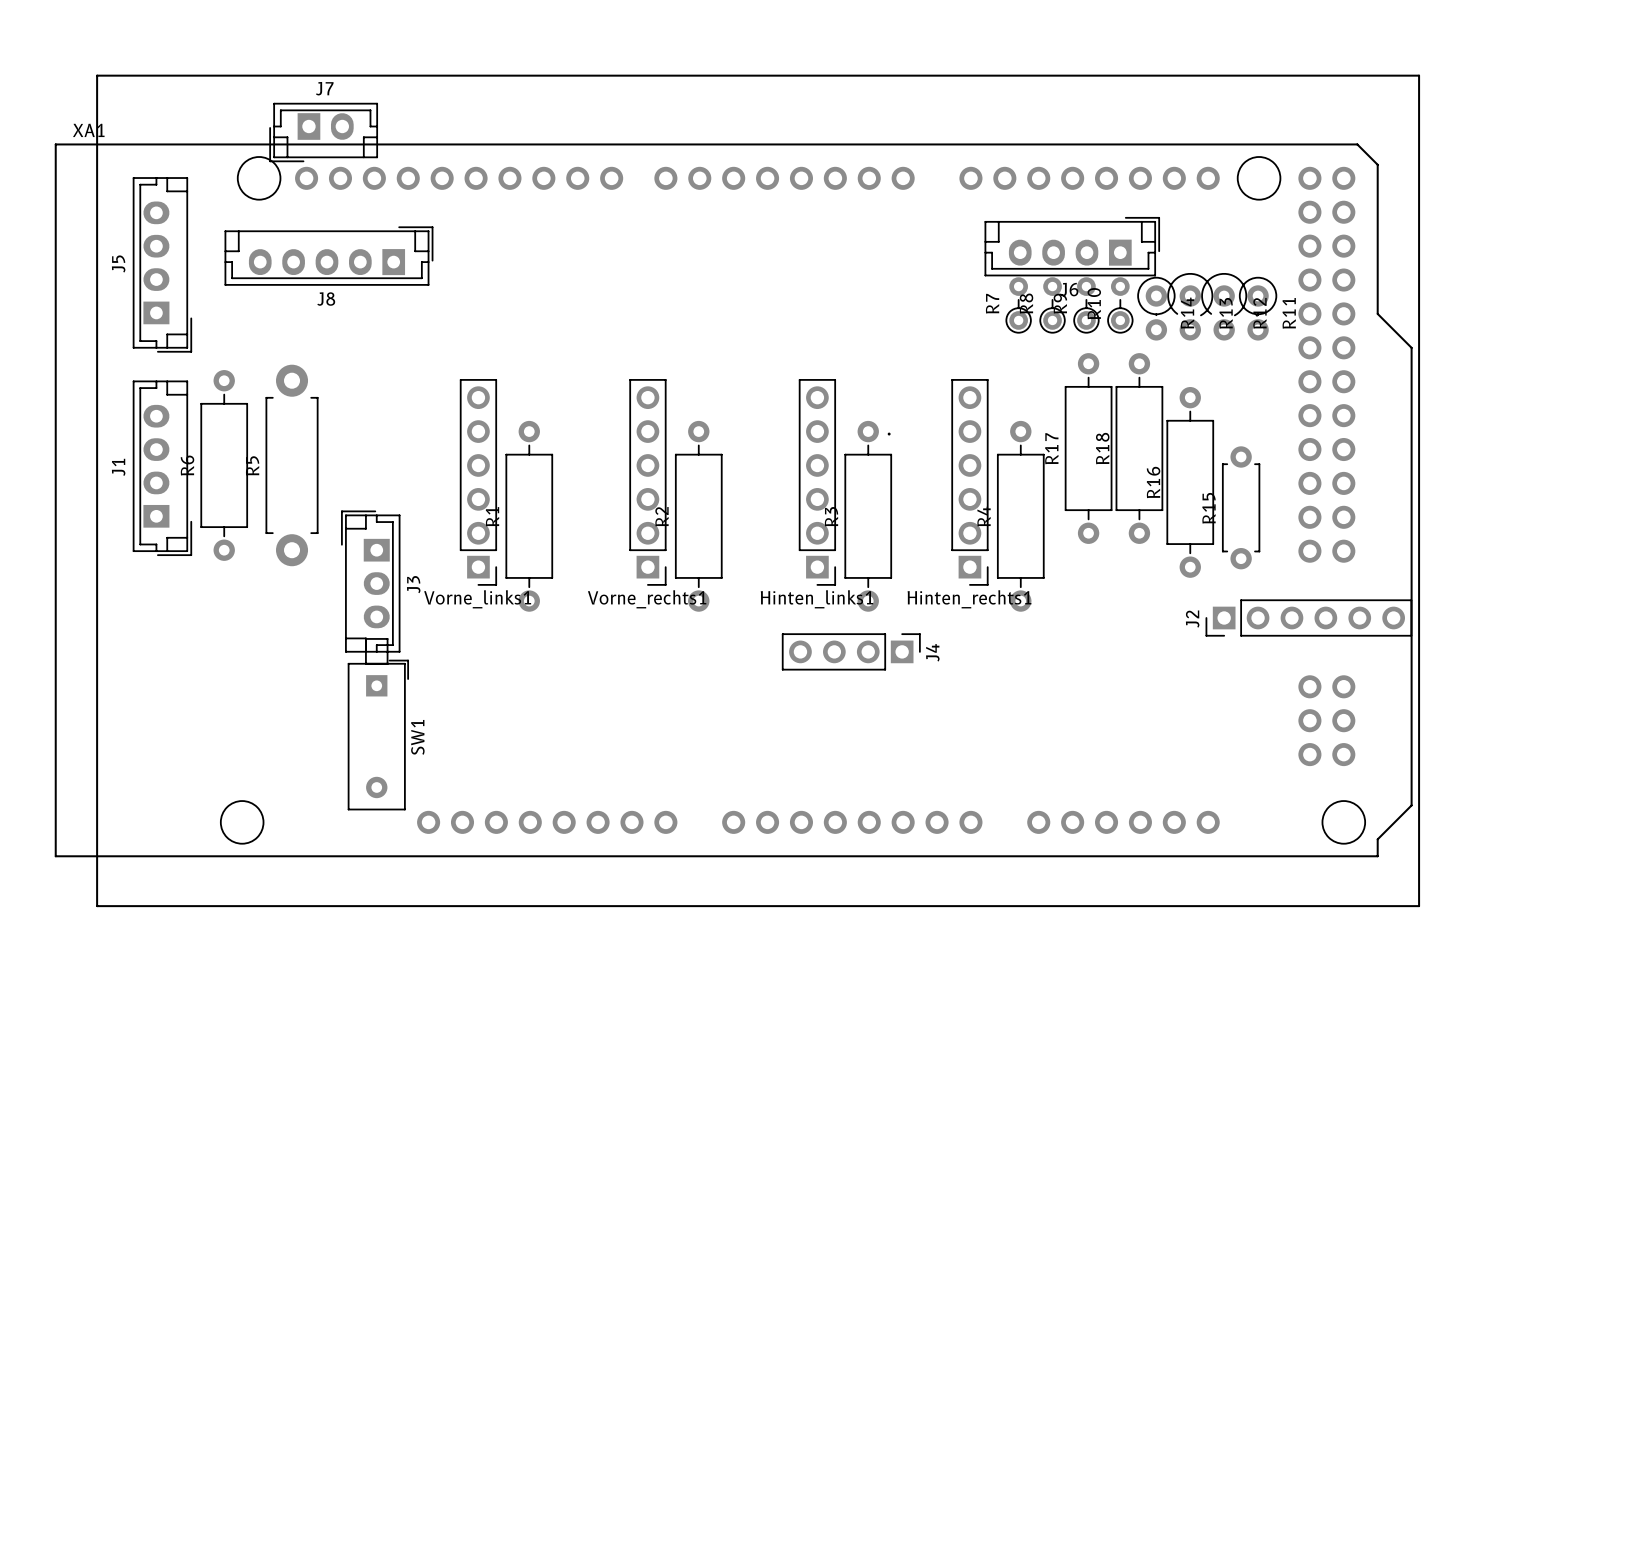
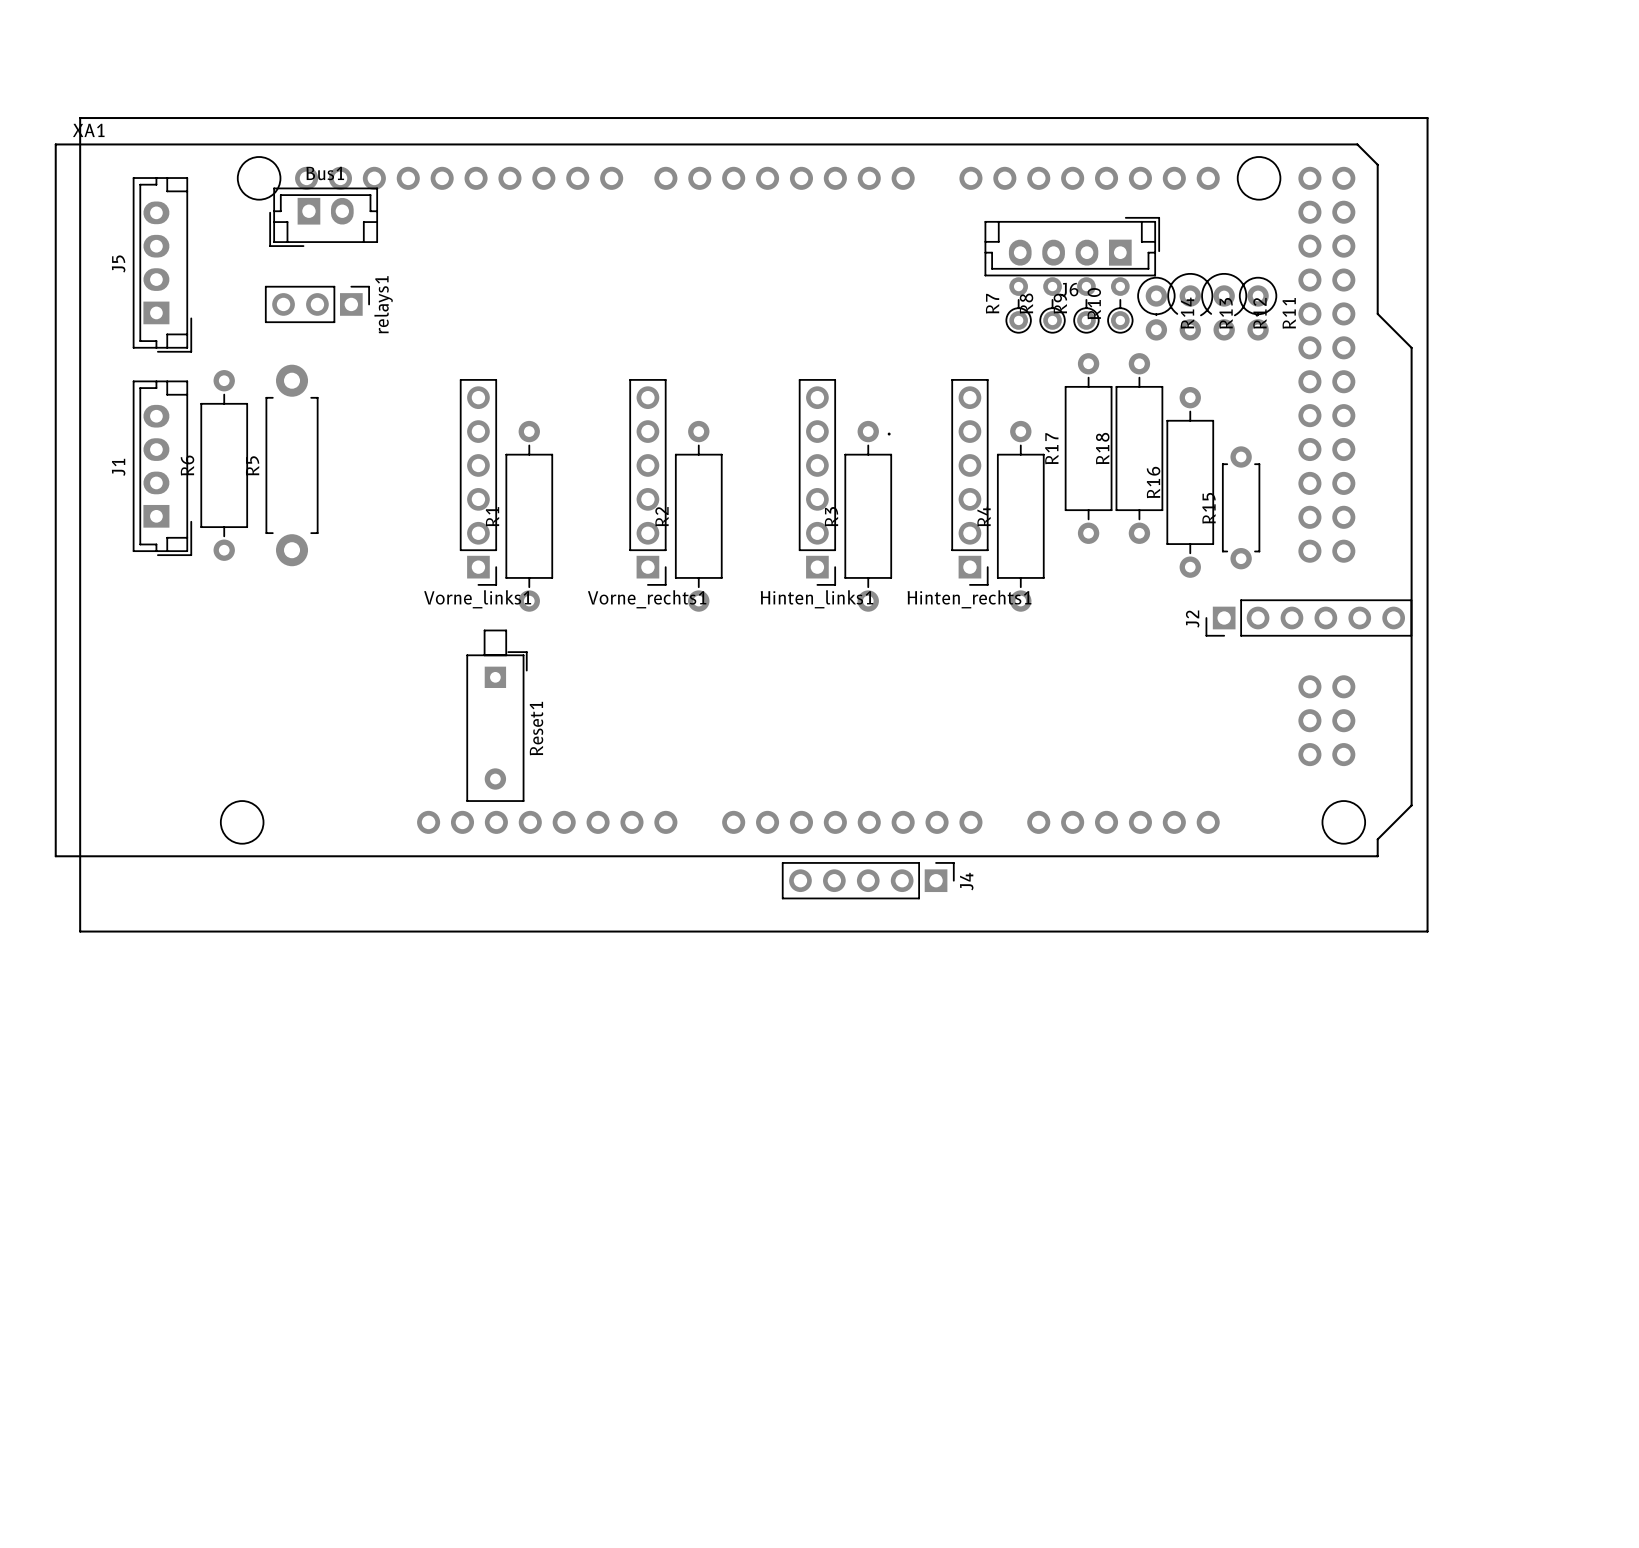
board edge: (97, 75) (1419, 75) (1419, 906) (97, 906) (97, 75) -> (80, 118) (80, 931) (1427, 931) (1427, 118) (80, 118)
J7: (323, 132) -> none
Bus1: none -> (323, 217)
J8: (328, 256) -> none
relays1: none -> (317, 304)
J3: (370, 581) -> none
J4 footprint: [781, 633, 921, 671] -> [781, 862, 955, 900]
Reset1: none -> (496, 715)
SW1: (378, 724) -> none

